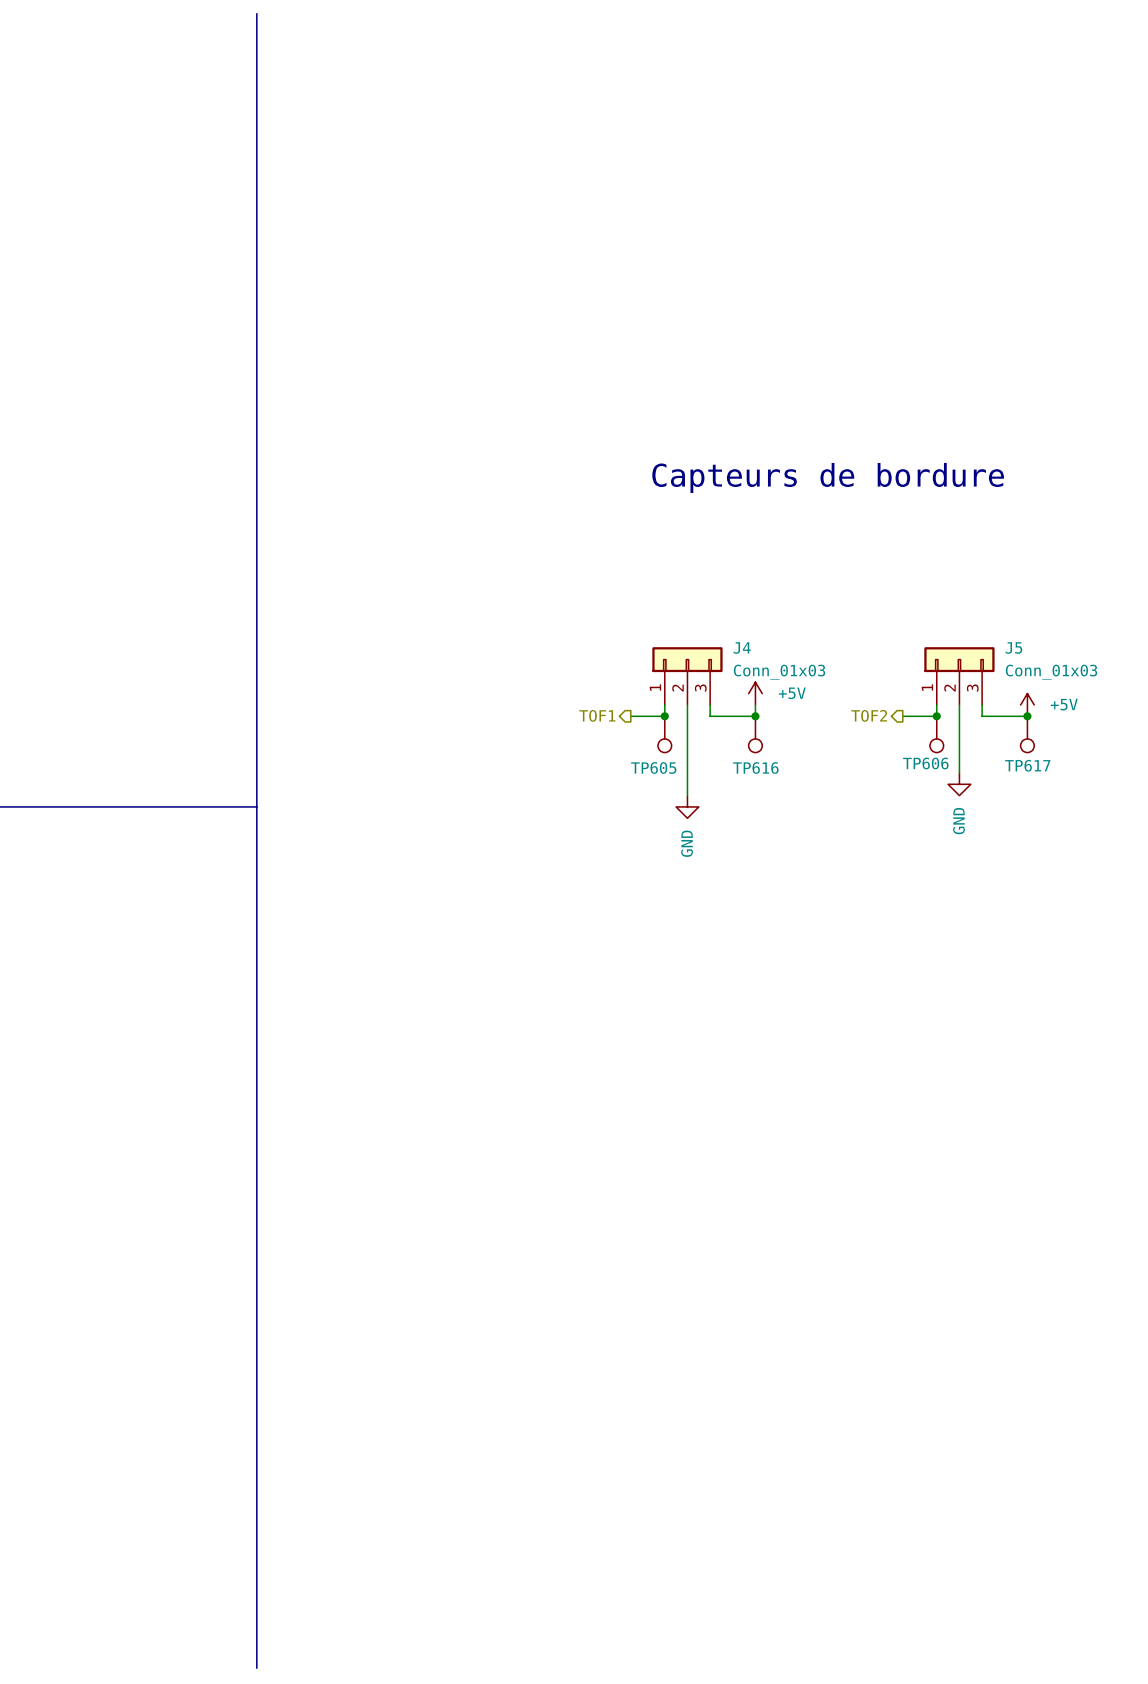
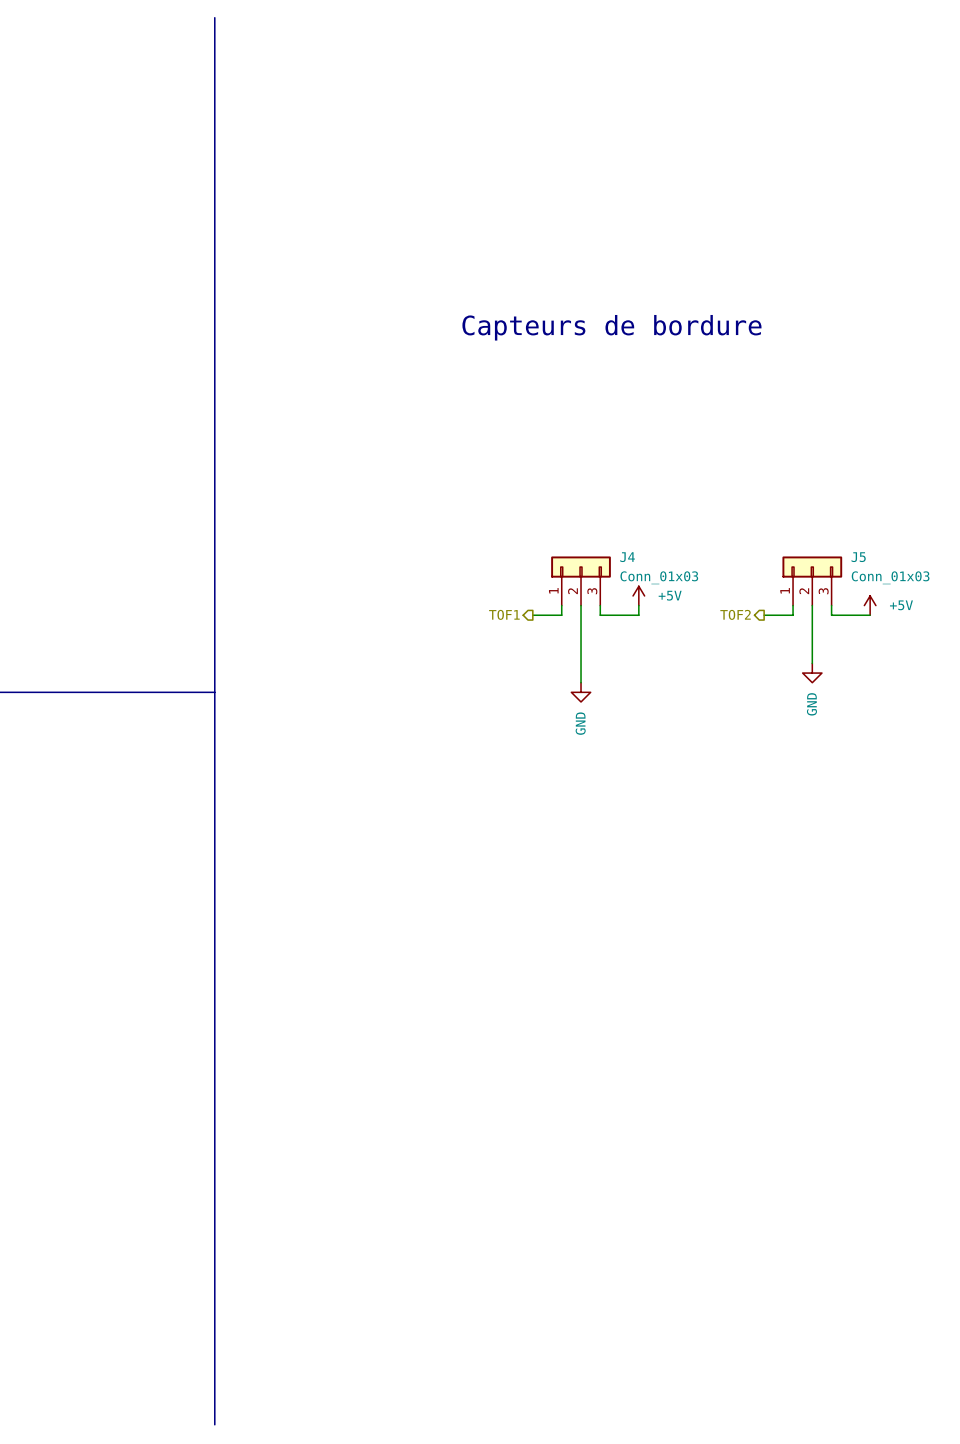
text position: Capteurs de bordure (828, 477) -> Capteurs de bordure (611, 327)
junction: (664, 716) -> none
junction: (755, 716) -> none
junction: (936, 716) -> none
junction: (1027, 716) -> none
TP605: (664, 734) -> none
TP616: (755, 734) -> none
TP606: (936, 734) -> none
TP617: (1027, 734) -> none

